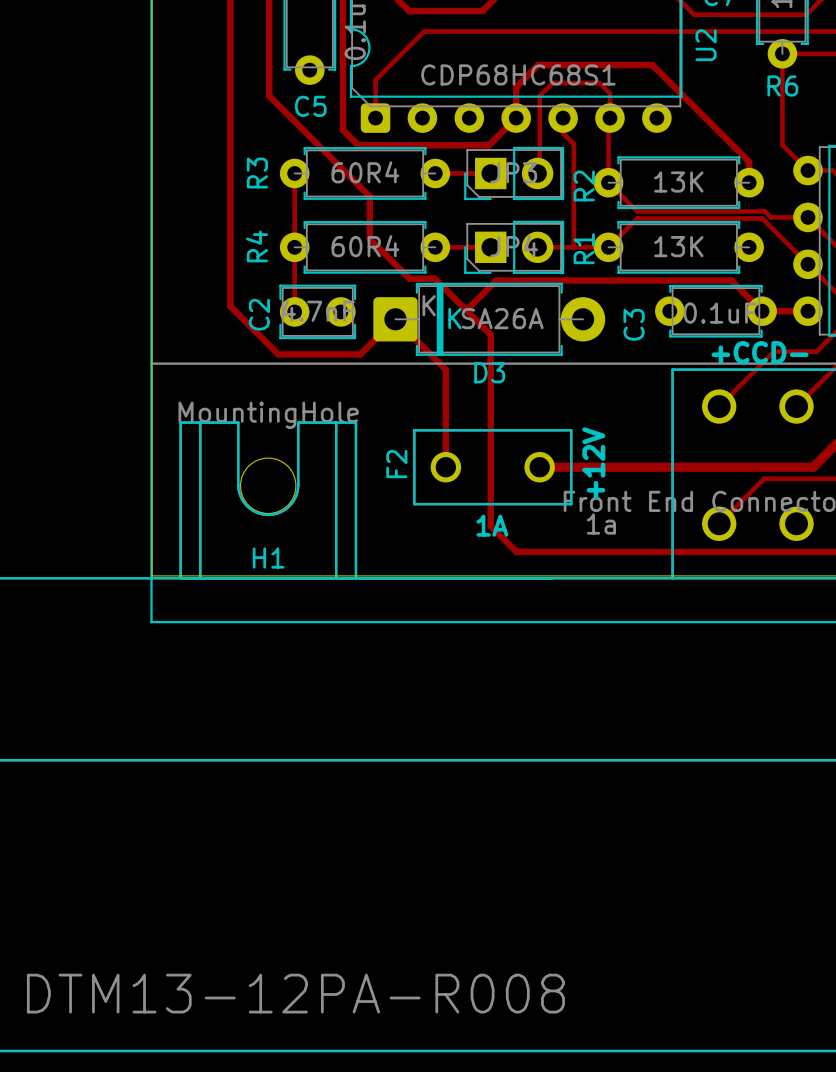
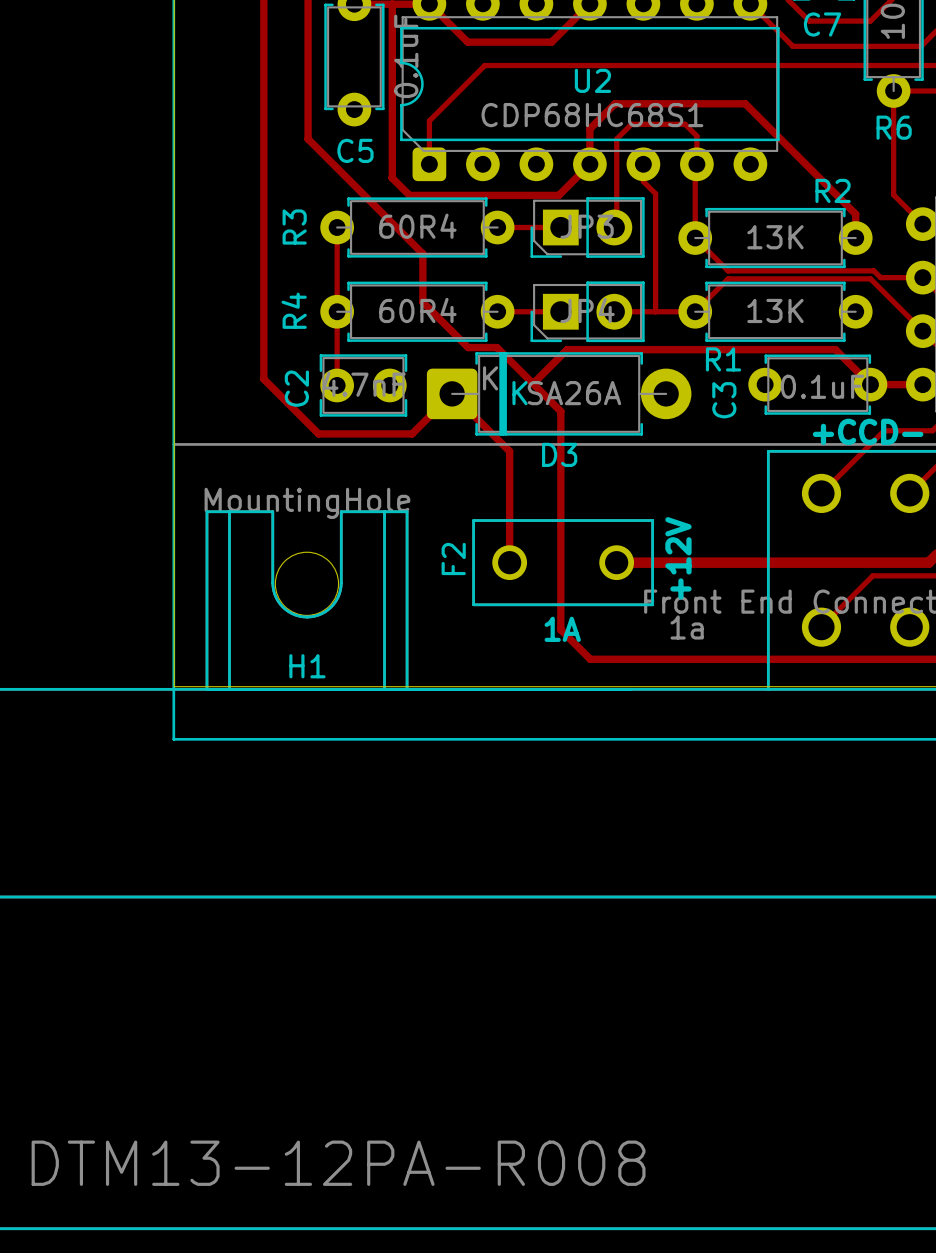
U2 name rotation: 0° (706, 45) -> 90° clockwise (592, 80)
U2 name position: U2 (706, 45) -> U2 (592, 80)
R2 name rotation: 0° (584, 185) -> 90° clockwise (833, 190)
R2 name position: R2 (584, 185) -> R2 (833, 190)
R1 name rotation: 0° (584, 248) -> 90° clockwise (723, 359)
R1 name position: R1 (584, 248) -> R1 (723, 359)

